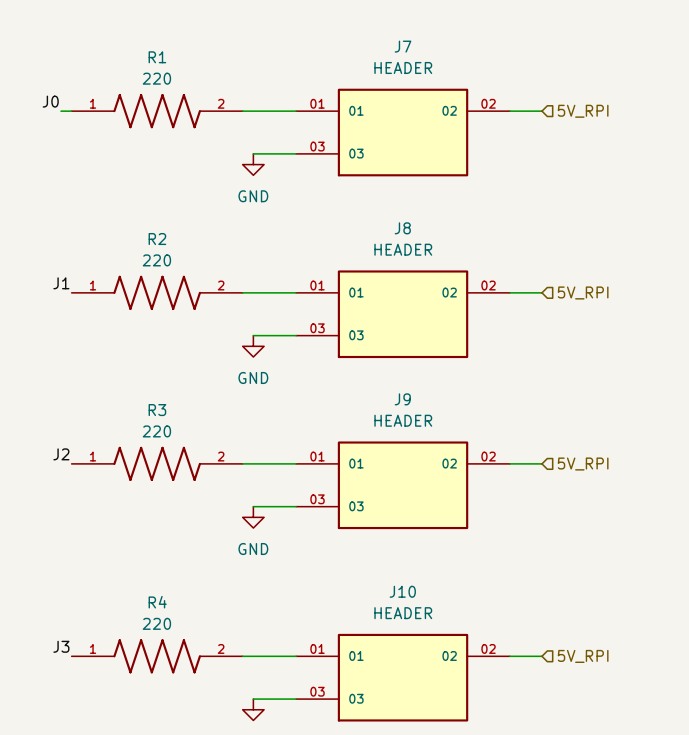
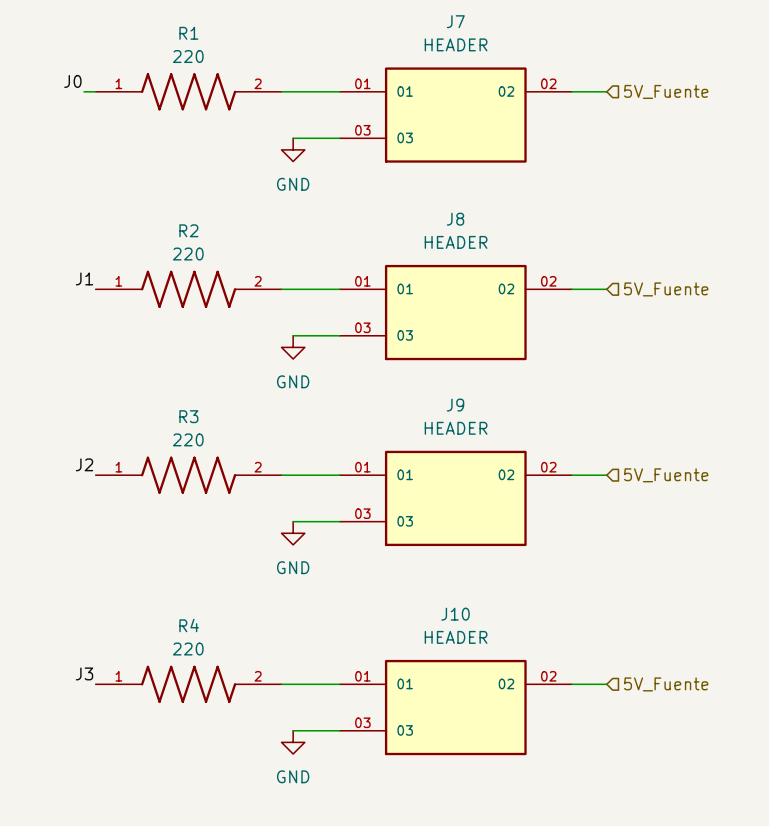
hierarchical label: 5V_RPI (583, 111) -> 5V_Fuente (666, 91)
hierarchical label: 5V_RPI (583, 292) -> 5V_Fuente (666, 289)
hierarchical label: 5V_RPI (583, 464) -> 5V_Fuente (666, 475)
hierarchical label: 5V_RPI (583, 656) -> 5V_Fuente (666, 684)

